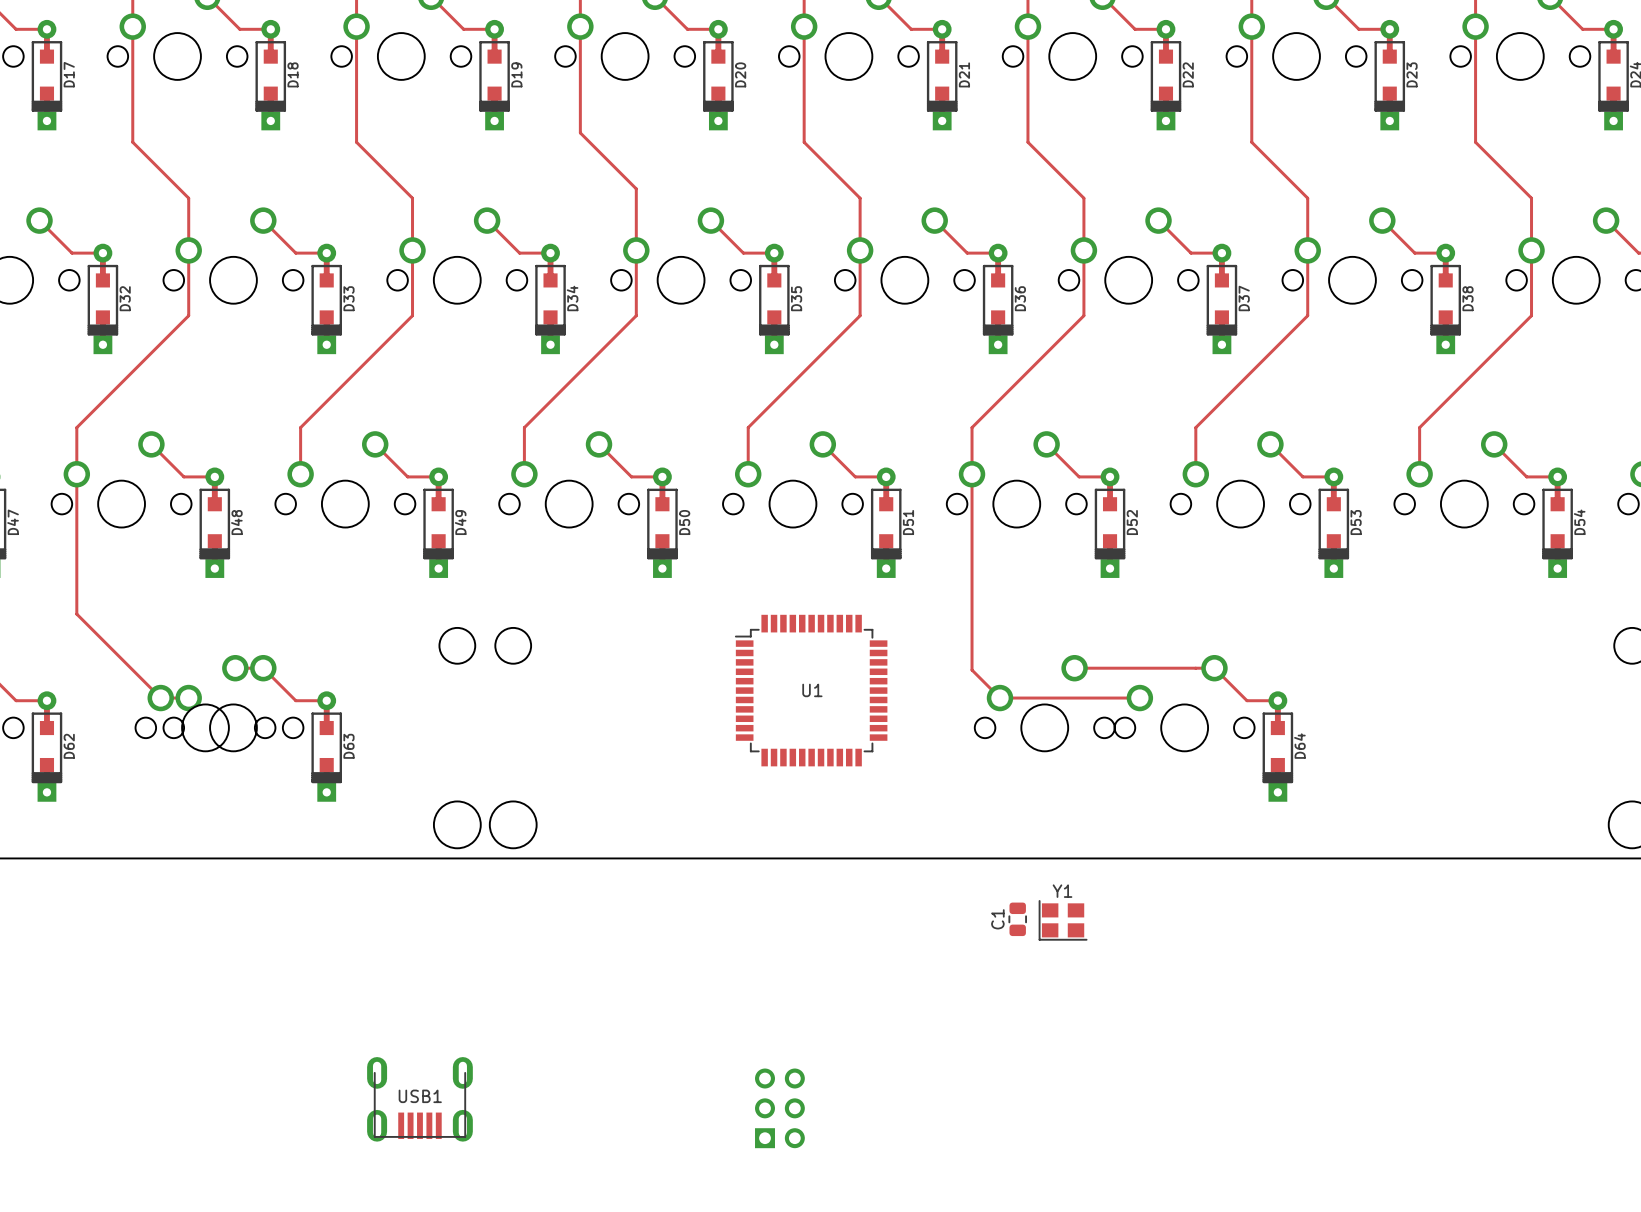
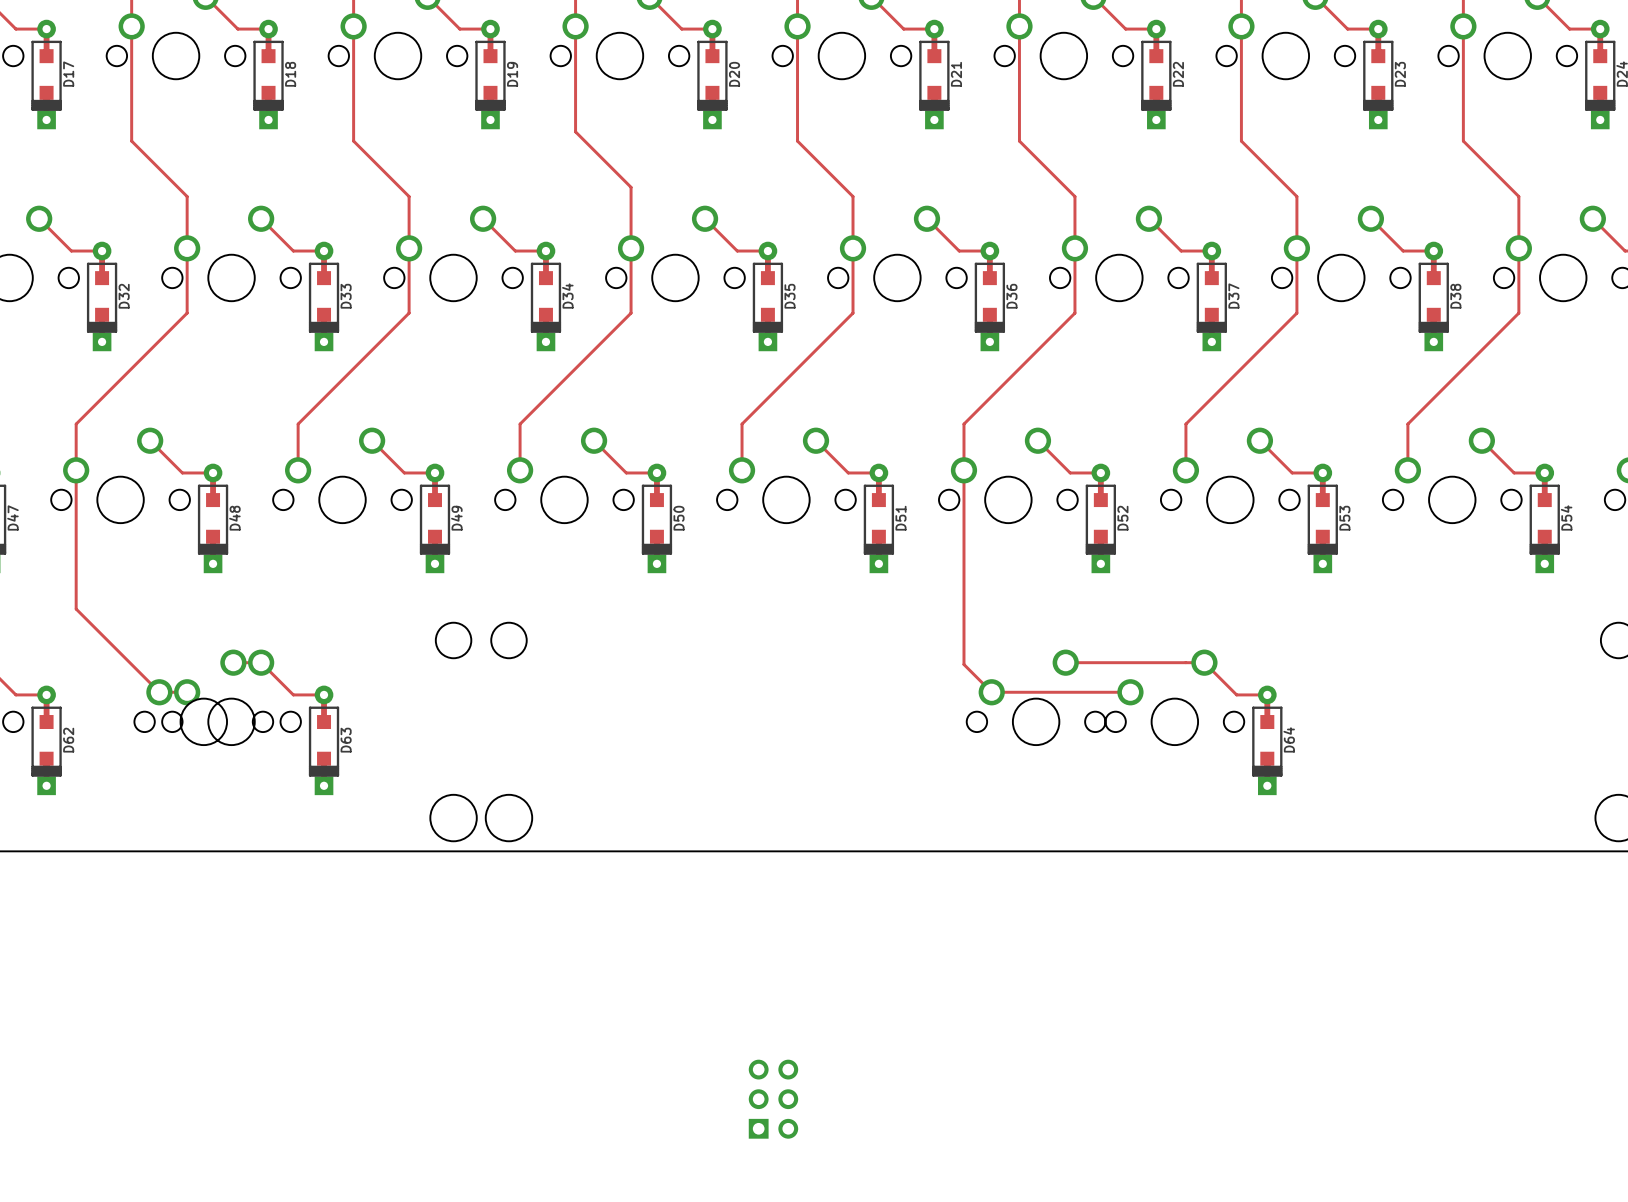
U1: (811, 690) -> none
C1: (1017, 919) -> none
Y1: (1063, 920) -> none
USB1: (419, 1099) -> none

